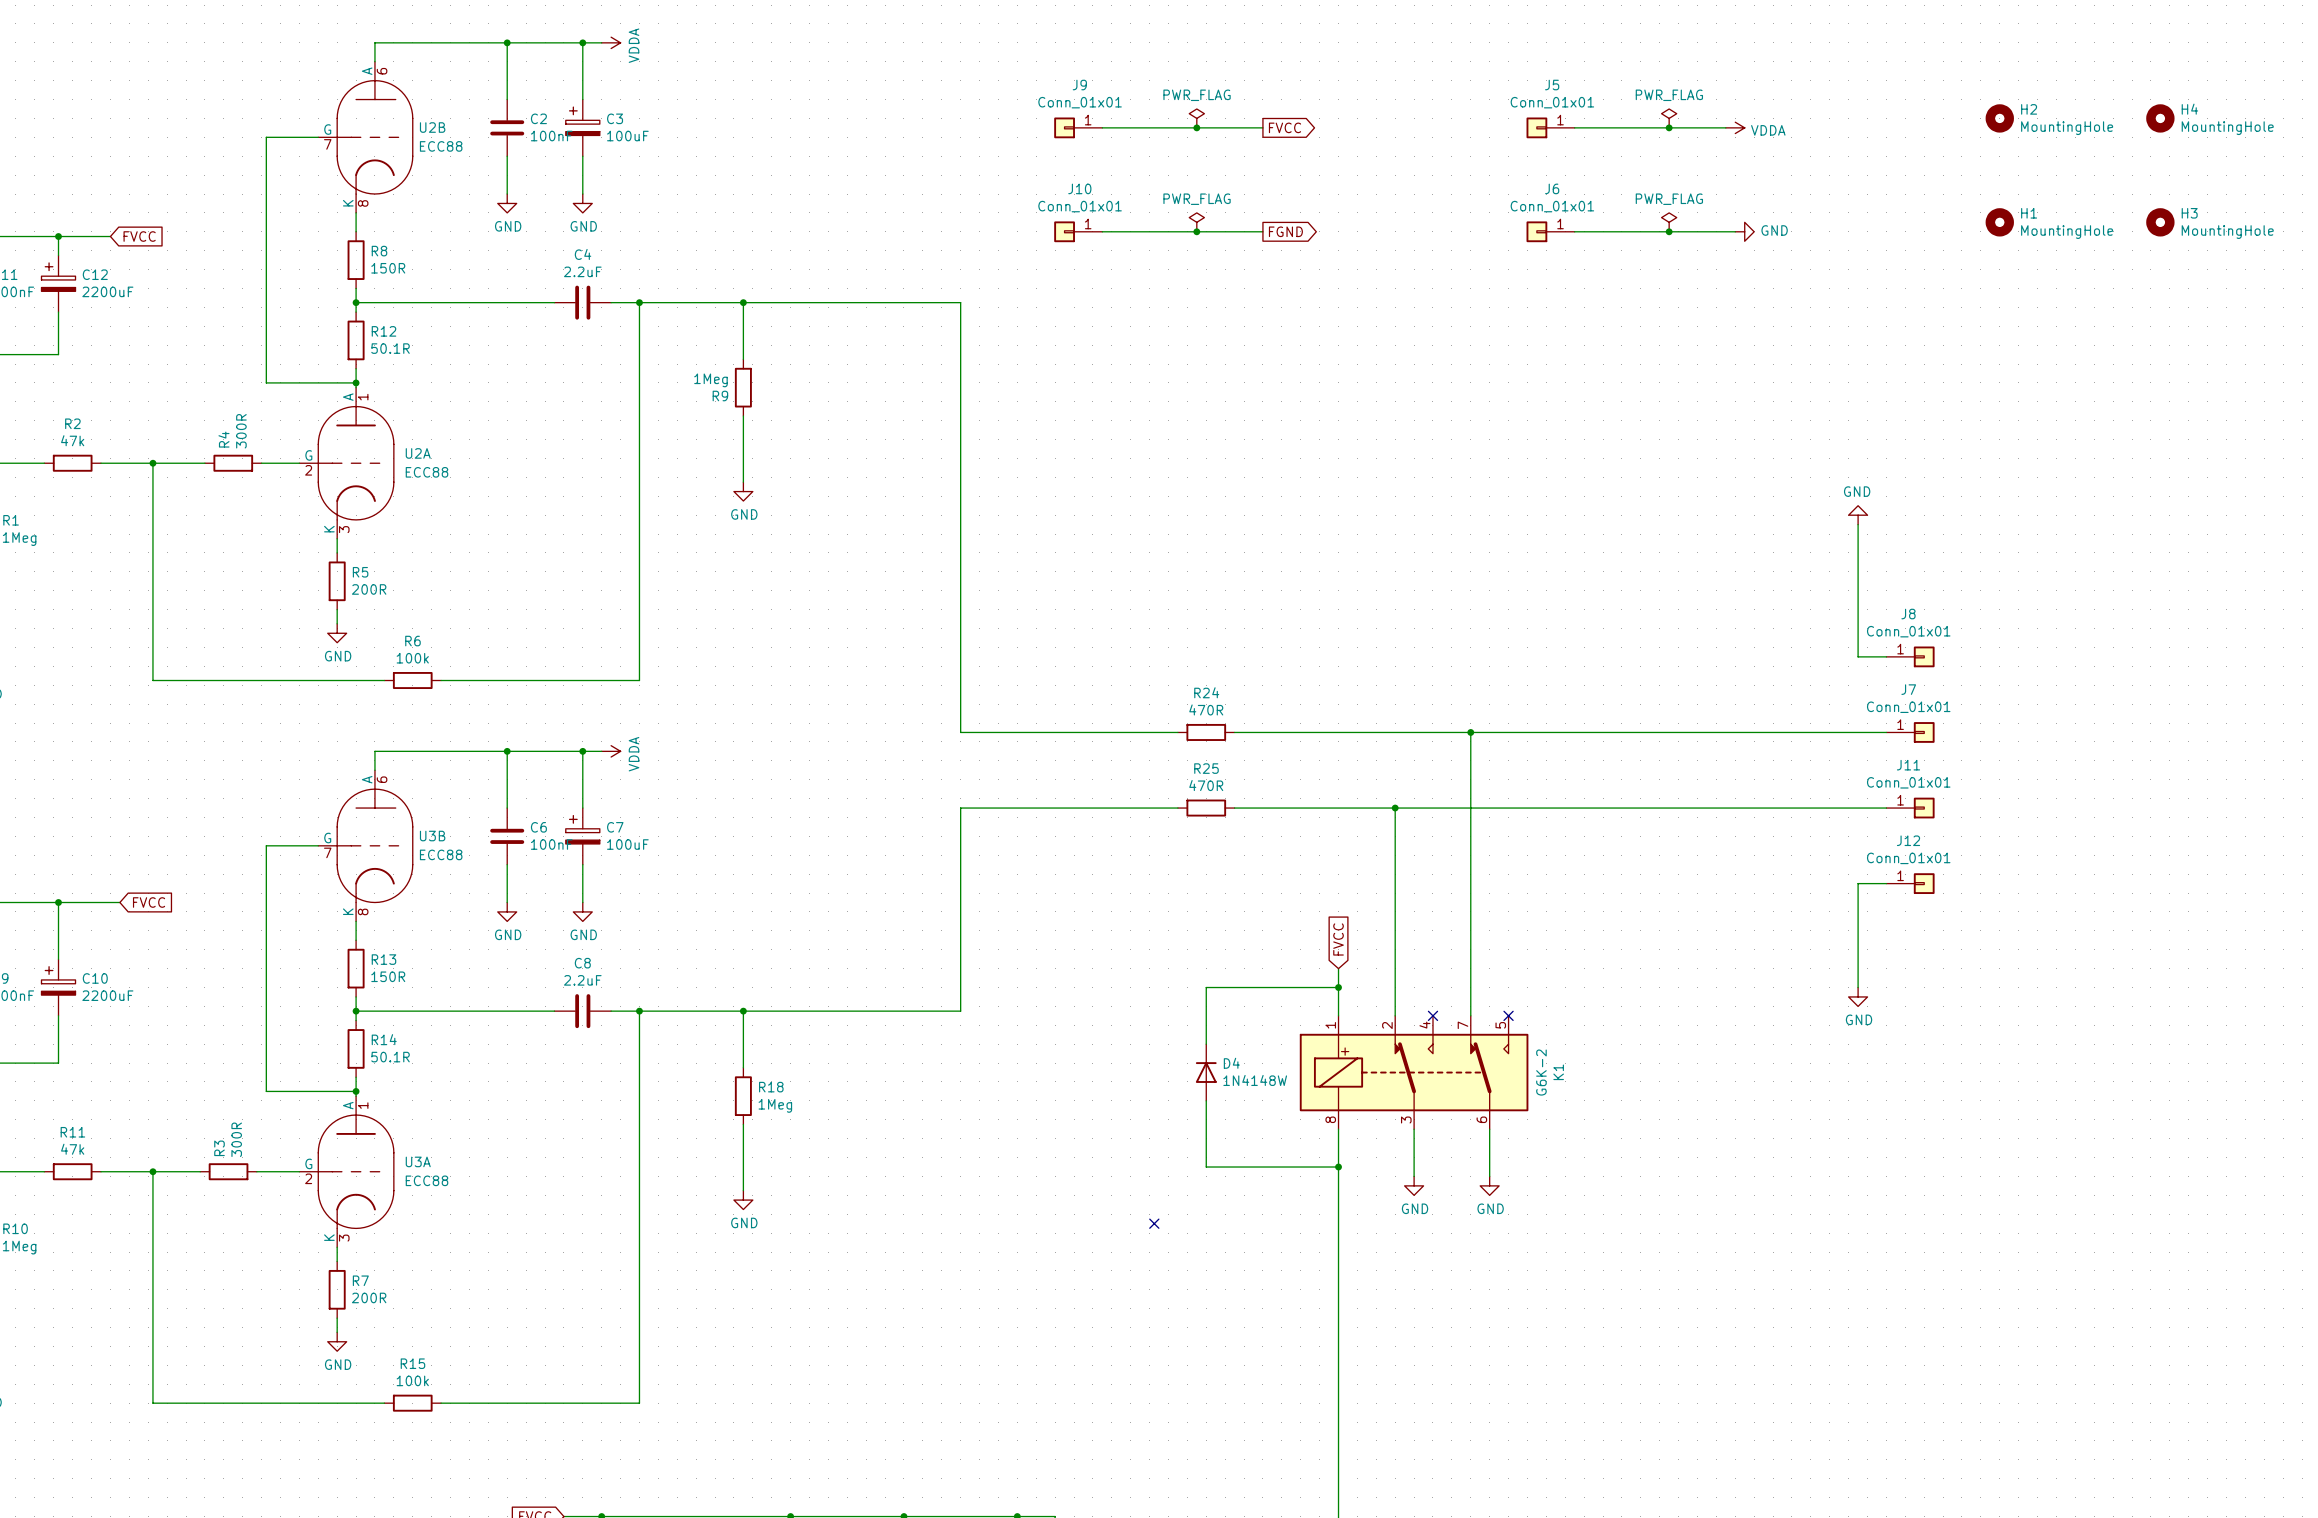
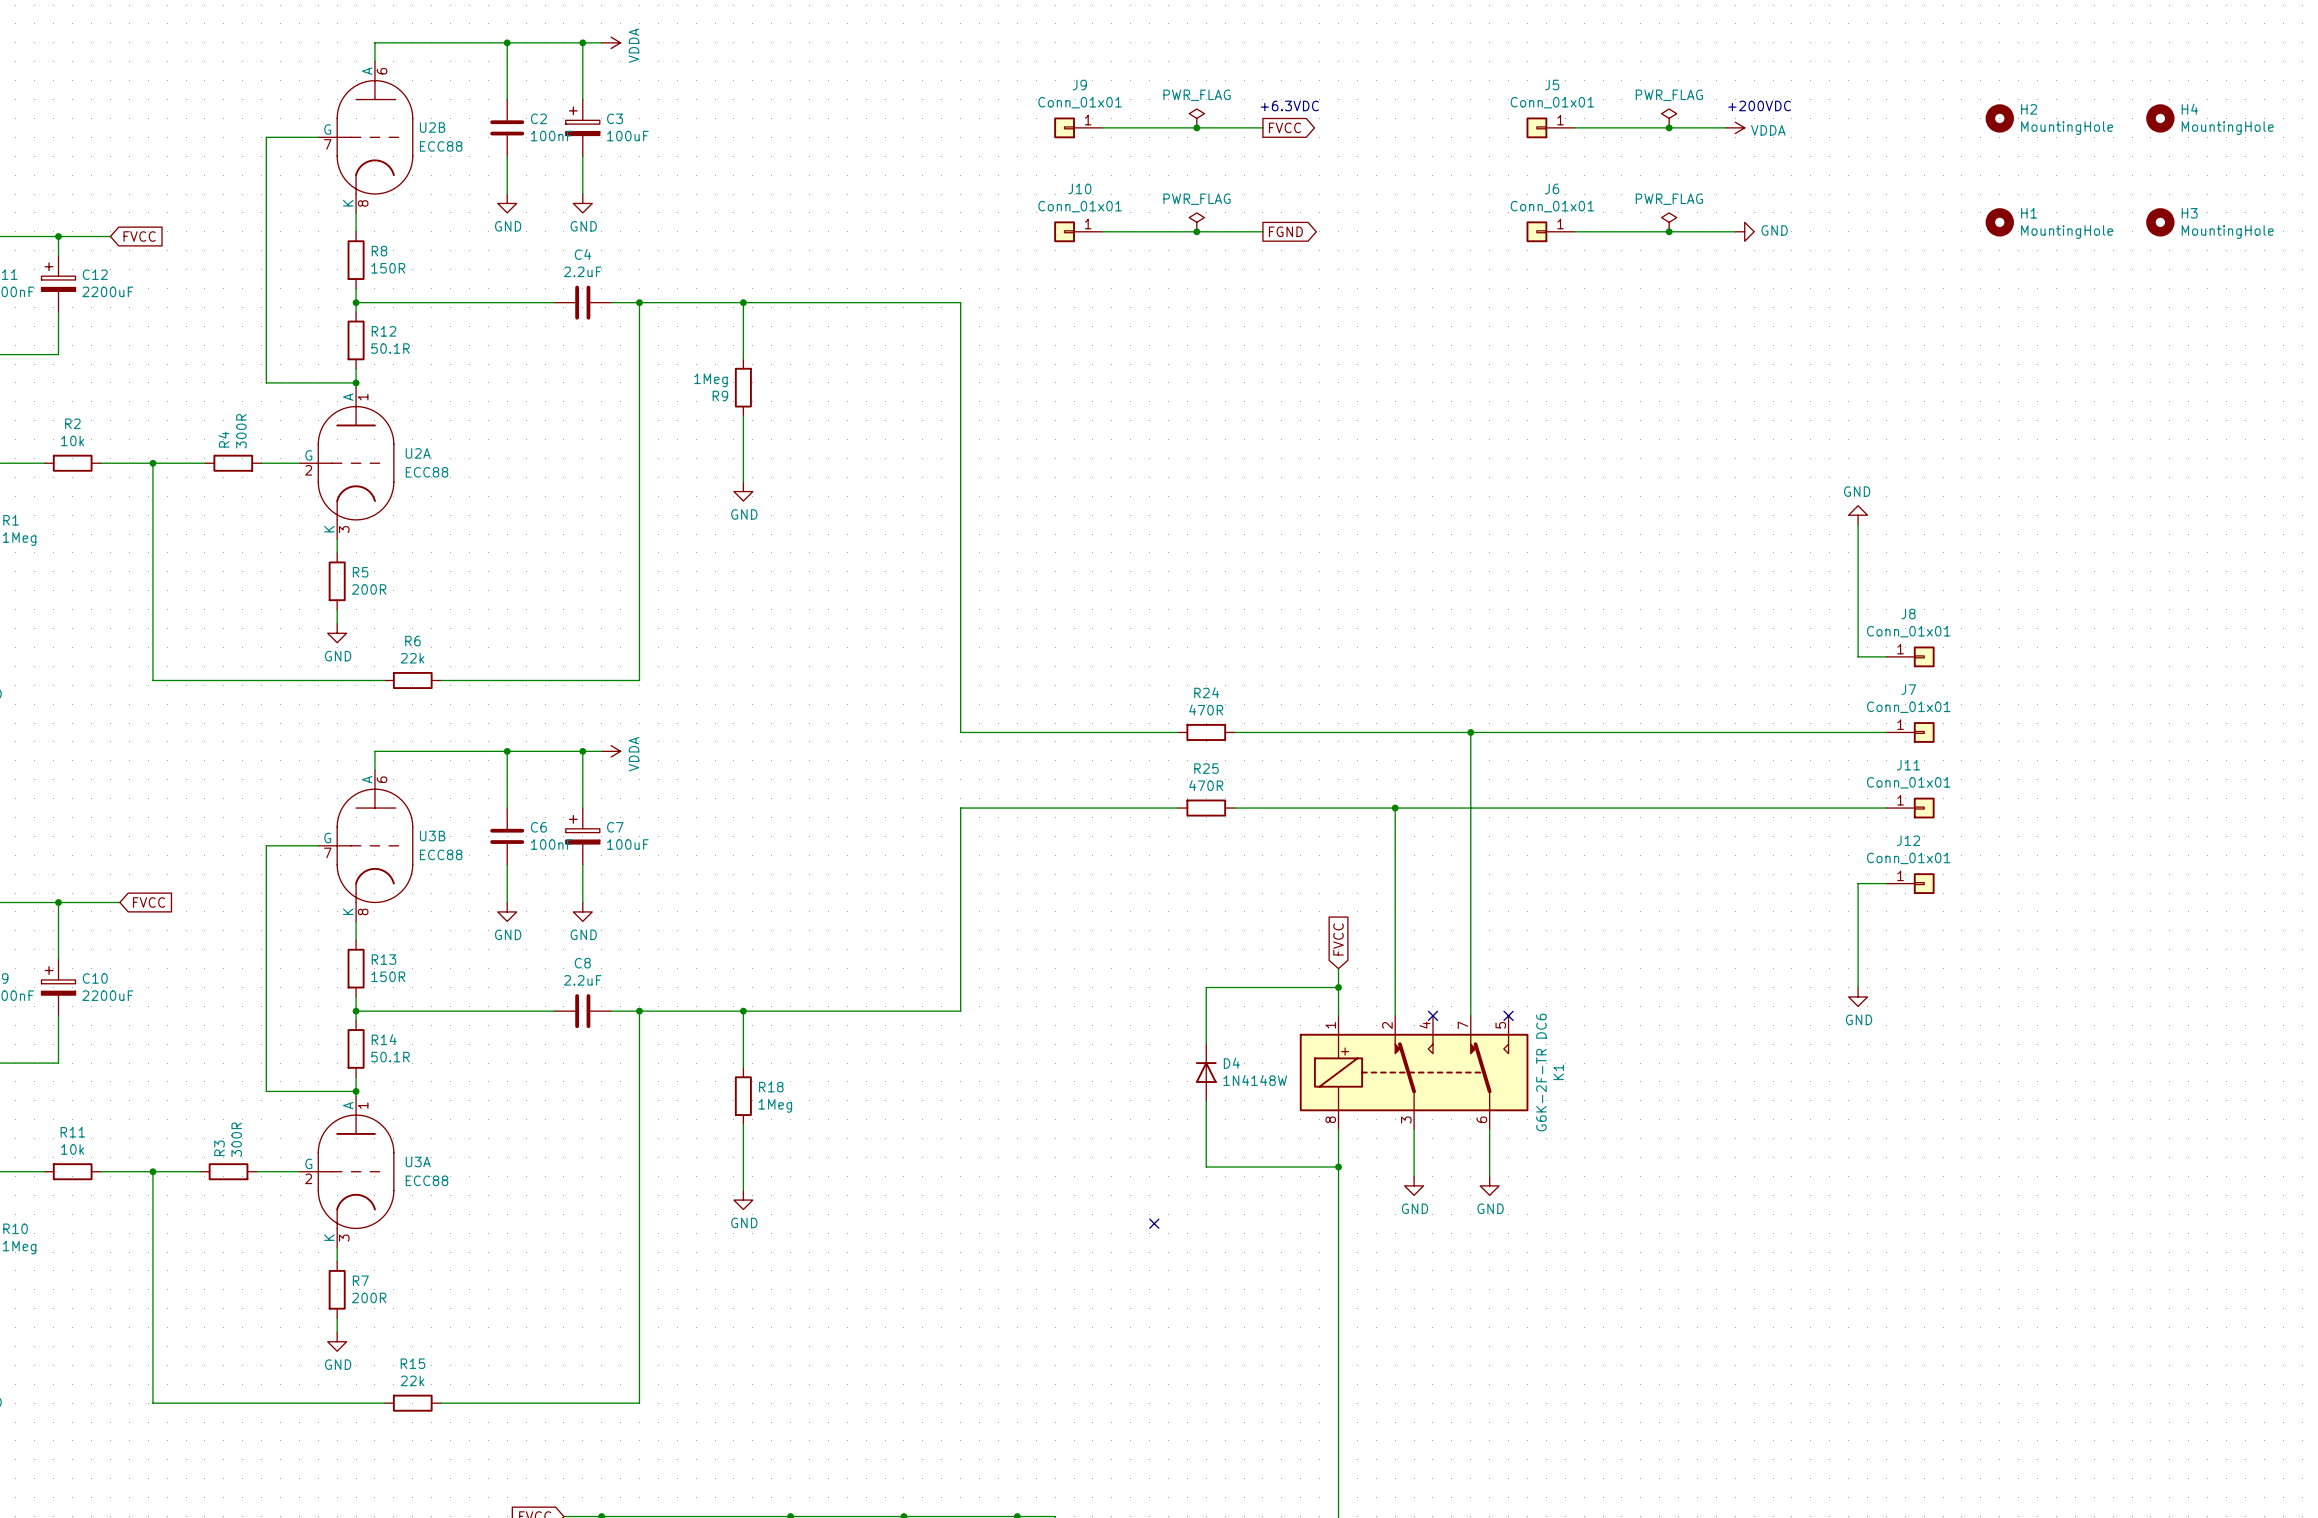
text: none -> +6.3VDC (1289, 105)
text: none -> +200VDC (1759, 105)
R2 value: 47k (72, 440) -> 10k (72, 440)
R6 value: 100k (412, 658) -> 22k (412, 658)
K1 value: G6K-2 (1541, 1072) -> G6K-2F-TR DC6 (1541, 1072)
R11 value: 47k (72, 1149) -> 10k (72, 1149)
R15 value: 100k (412, 1380) -> 22k (412, 1380)

